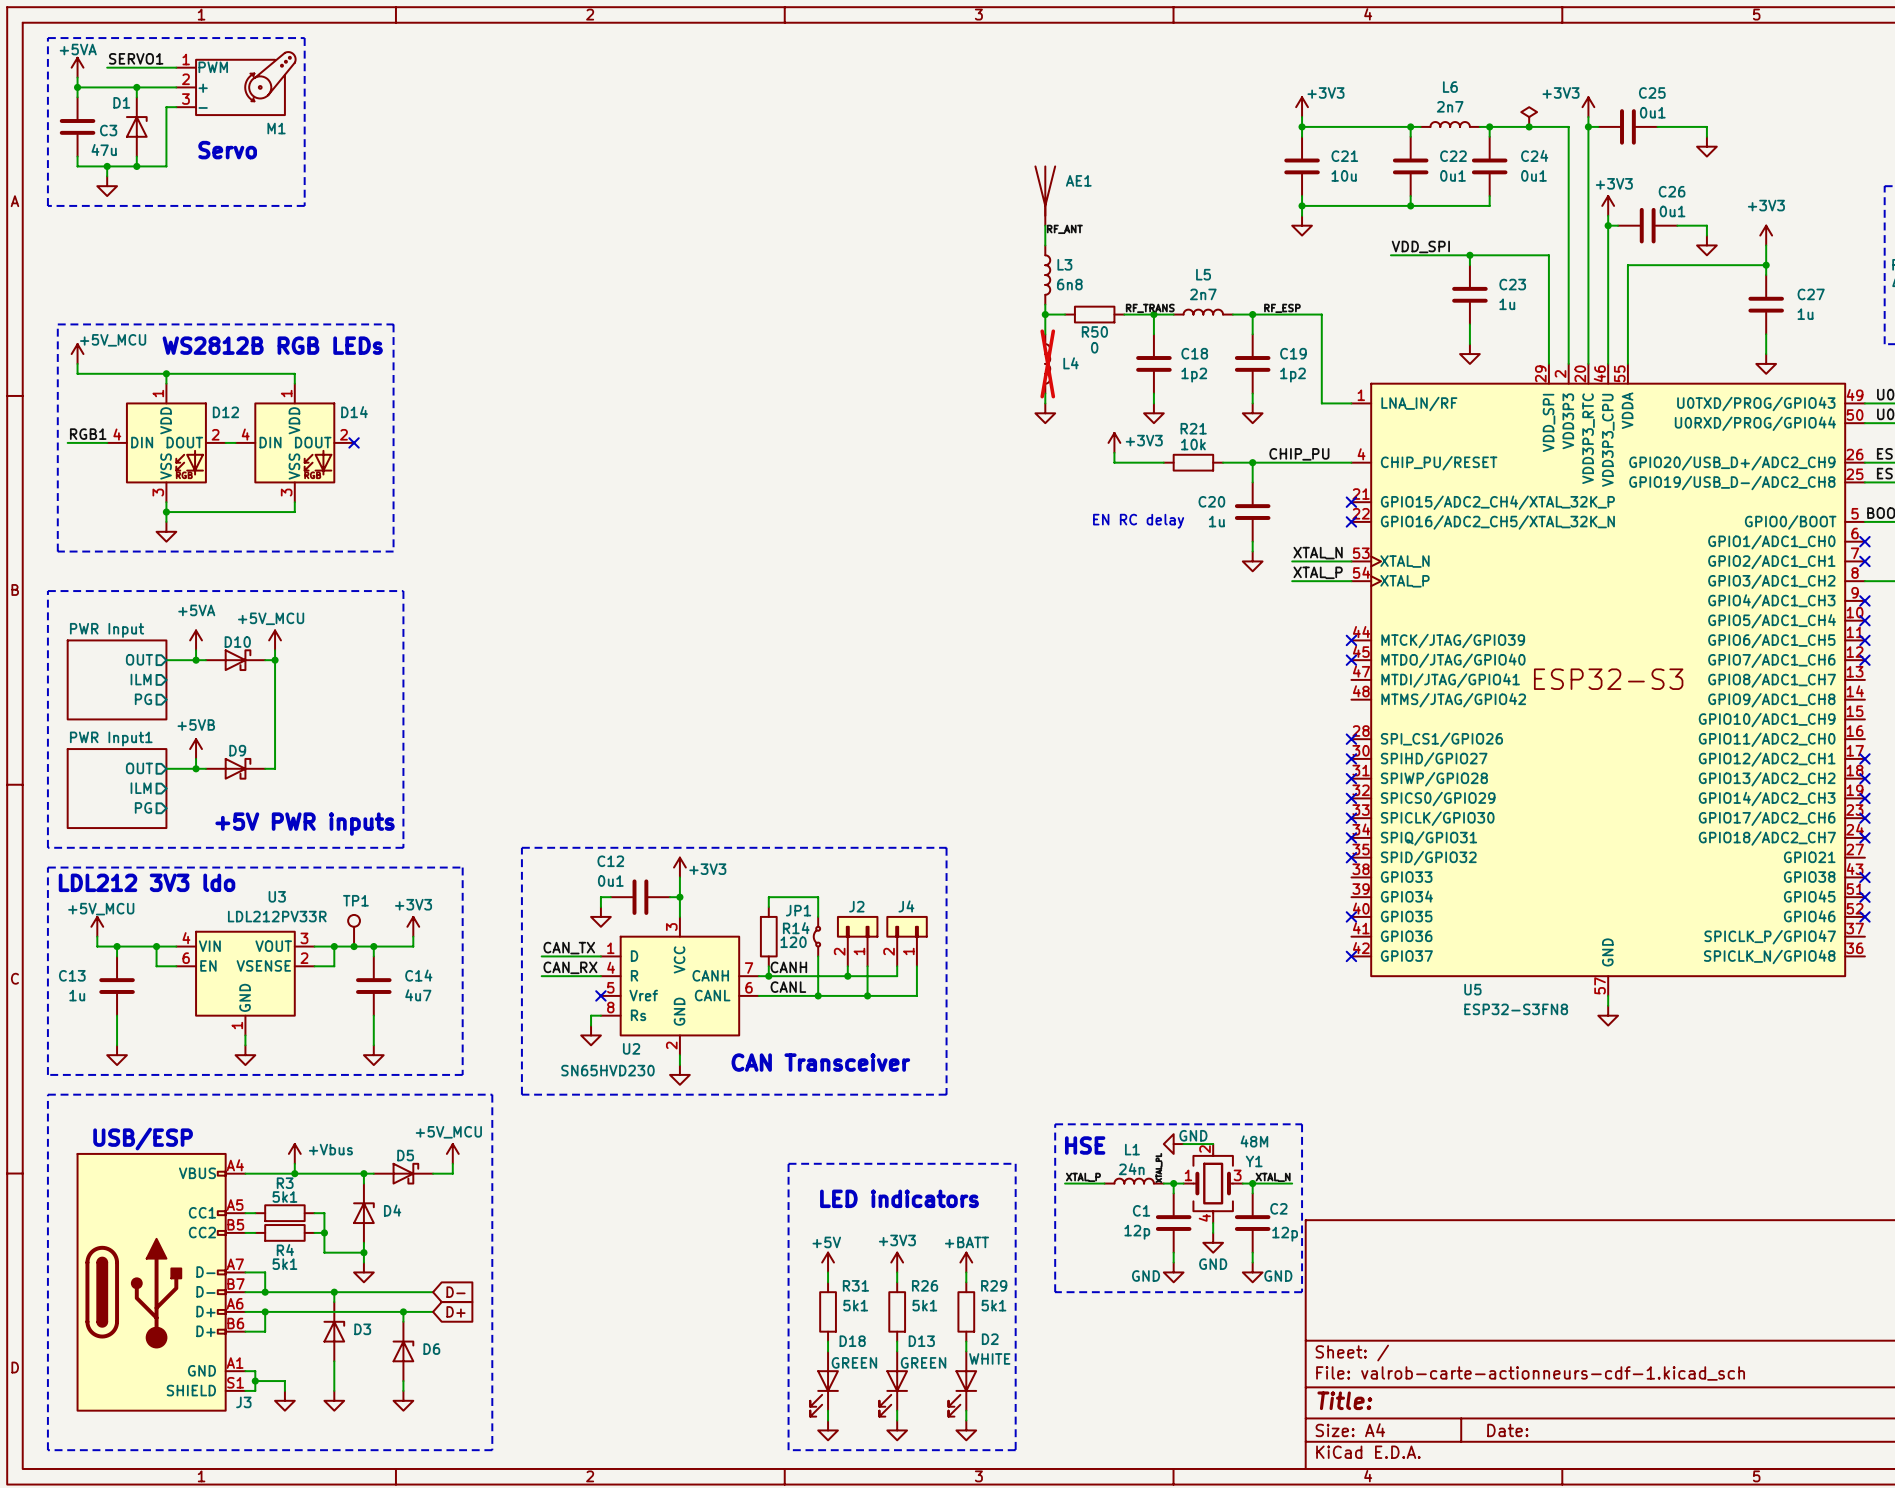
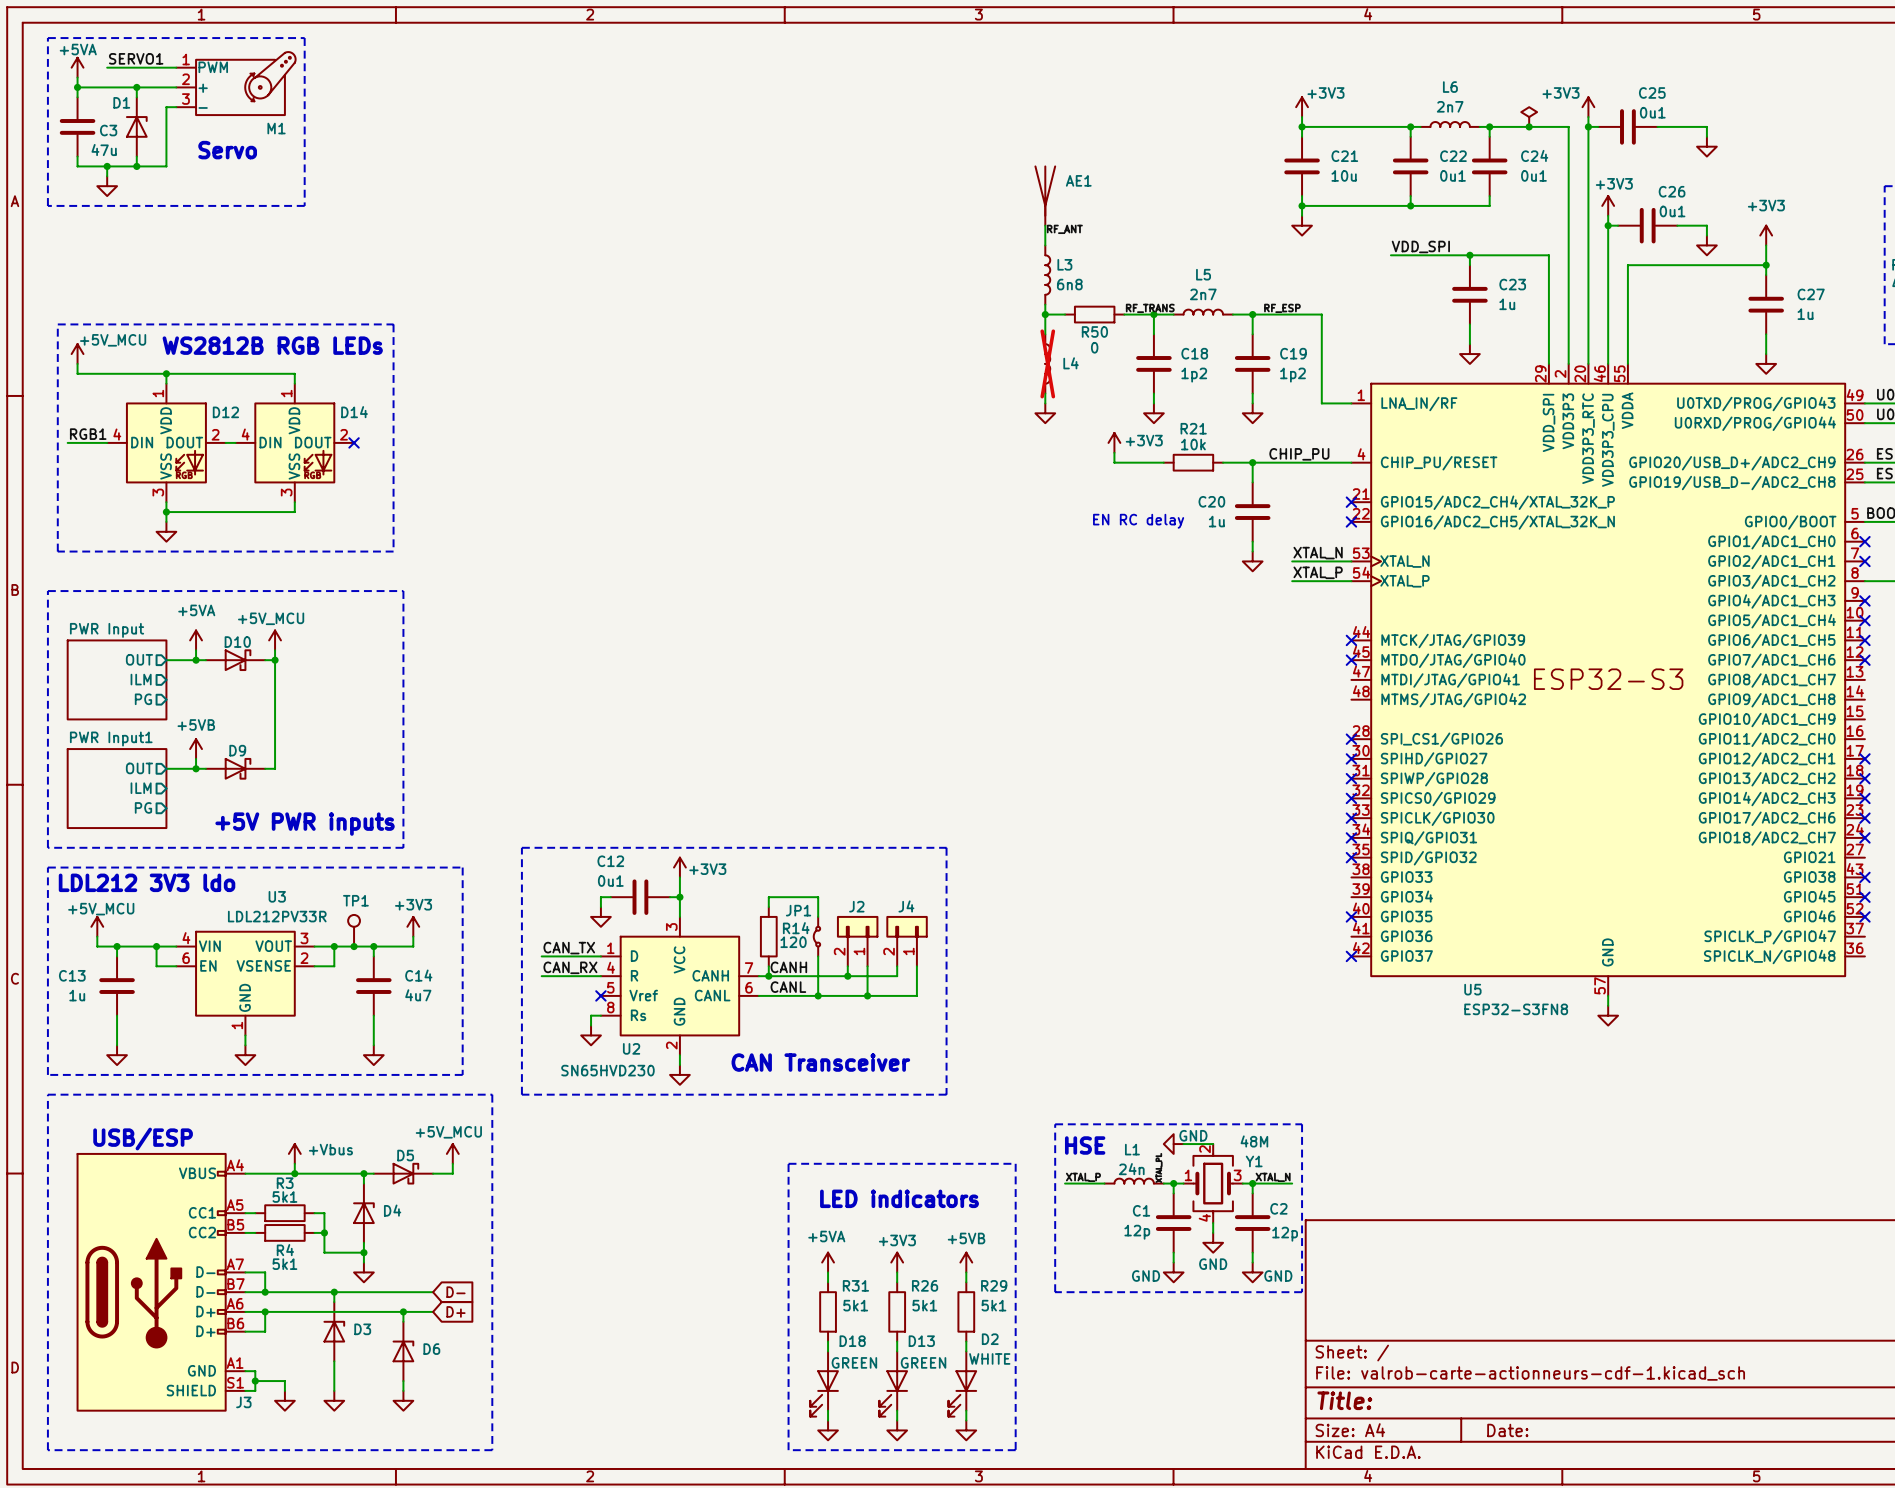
power symbol: +5V (828, 1262) -> +5VA (828, 1262)
power symbol: +BATT (966, 1262) -> +5VB (966, 1262)

